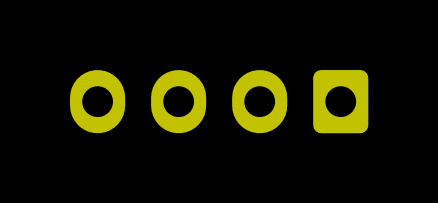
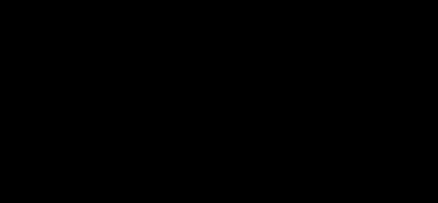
part: (219, 101) -> none

